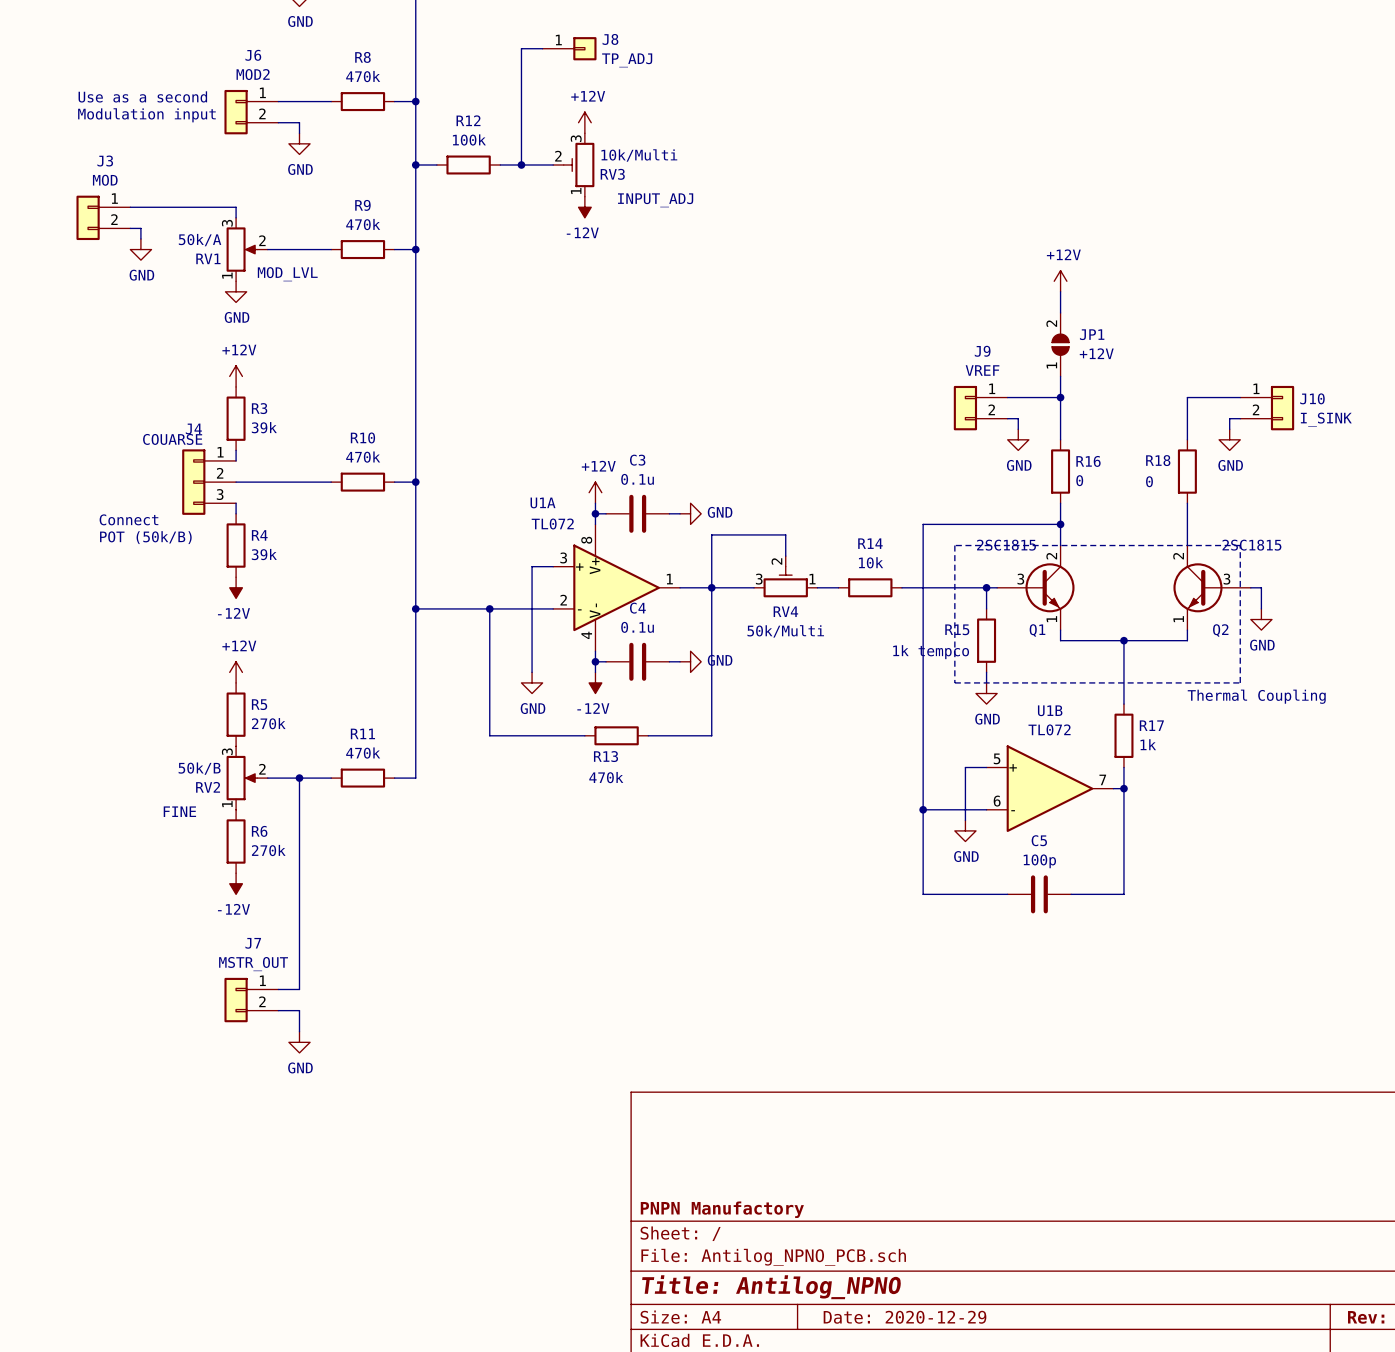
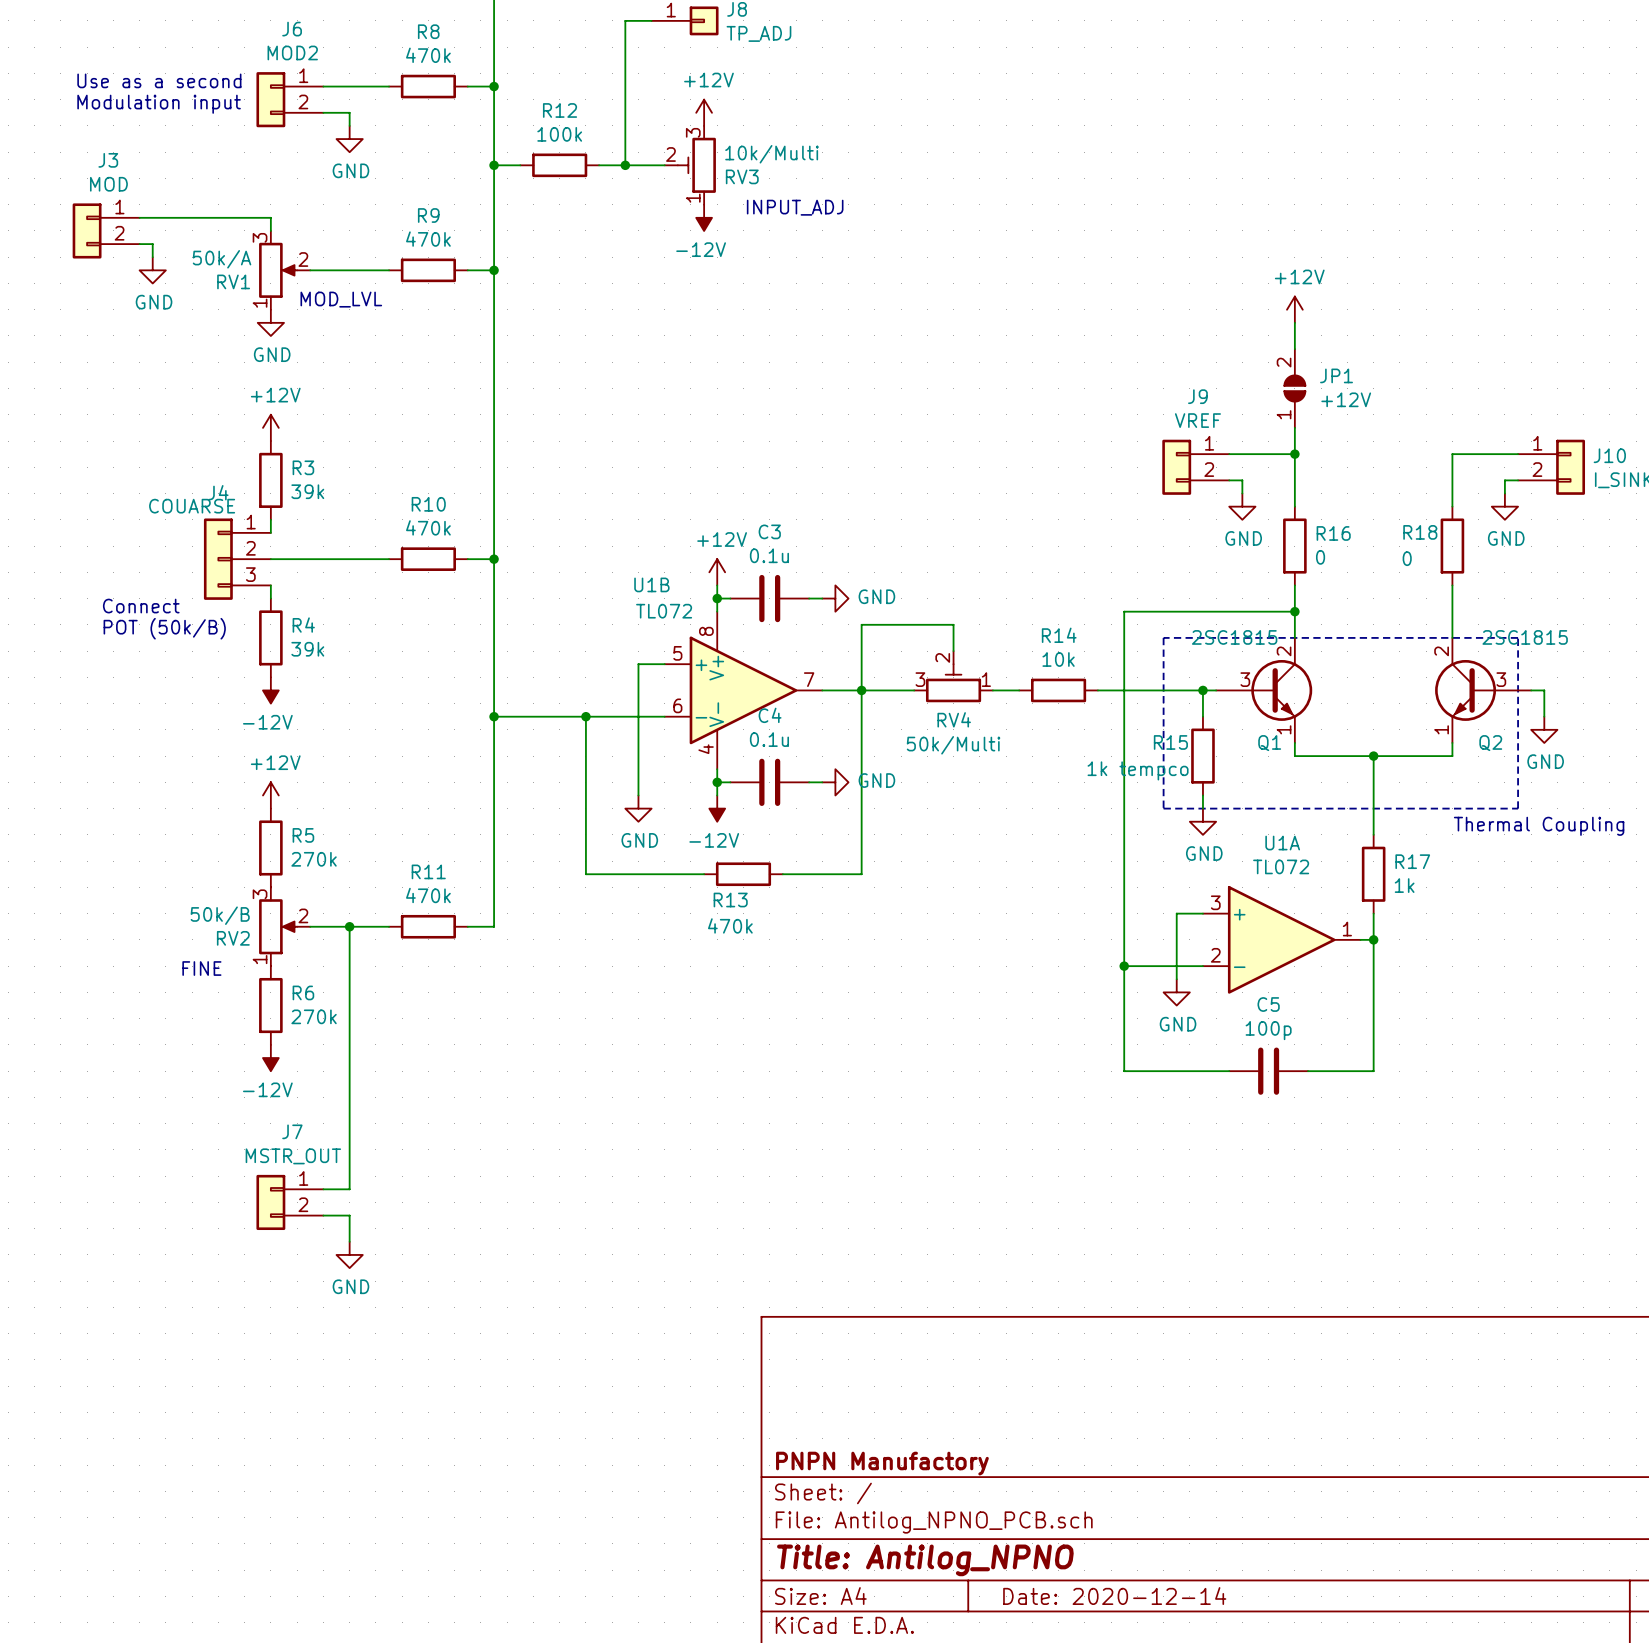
U1A name position: U1A (543, 502) -> U1A (1282, 843)
U1A position: (616, 587) -> (1281, 939)
U1B name position: U1B (1050, 710) -> U1B (651, 584)
U1B position: (1049, 788) -> (743, 690)
title block: Date: 2020-12-29 (905, 1317) -> Date: 2020-12-14 (1114, 1596)

